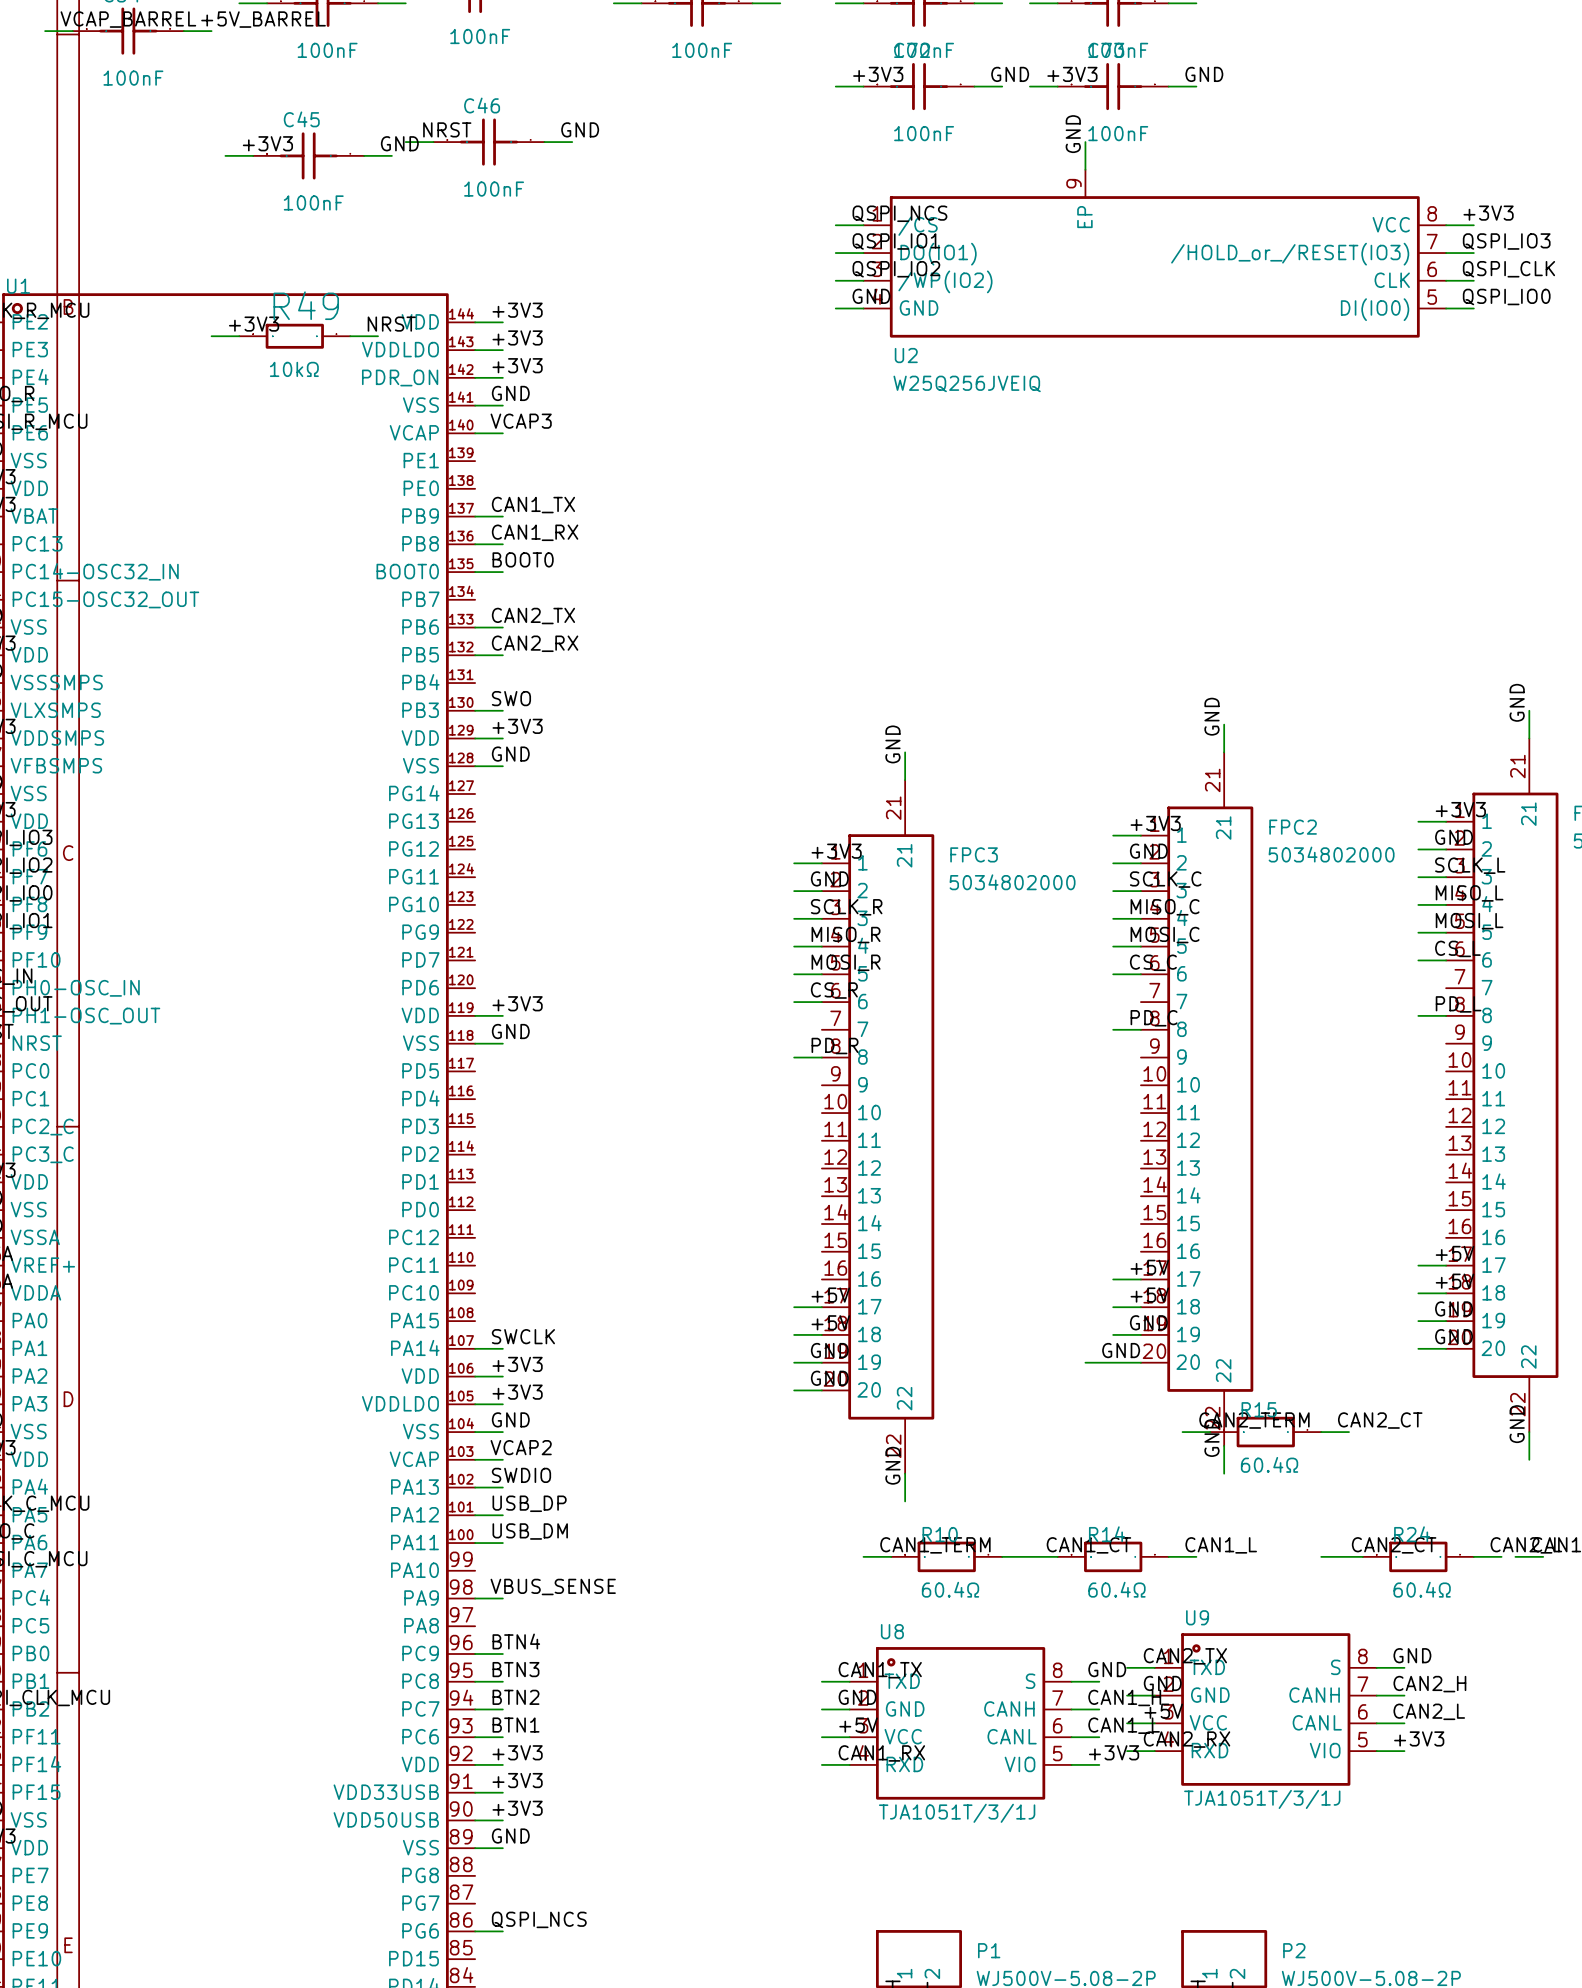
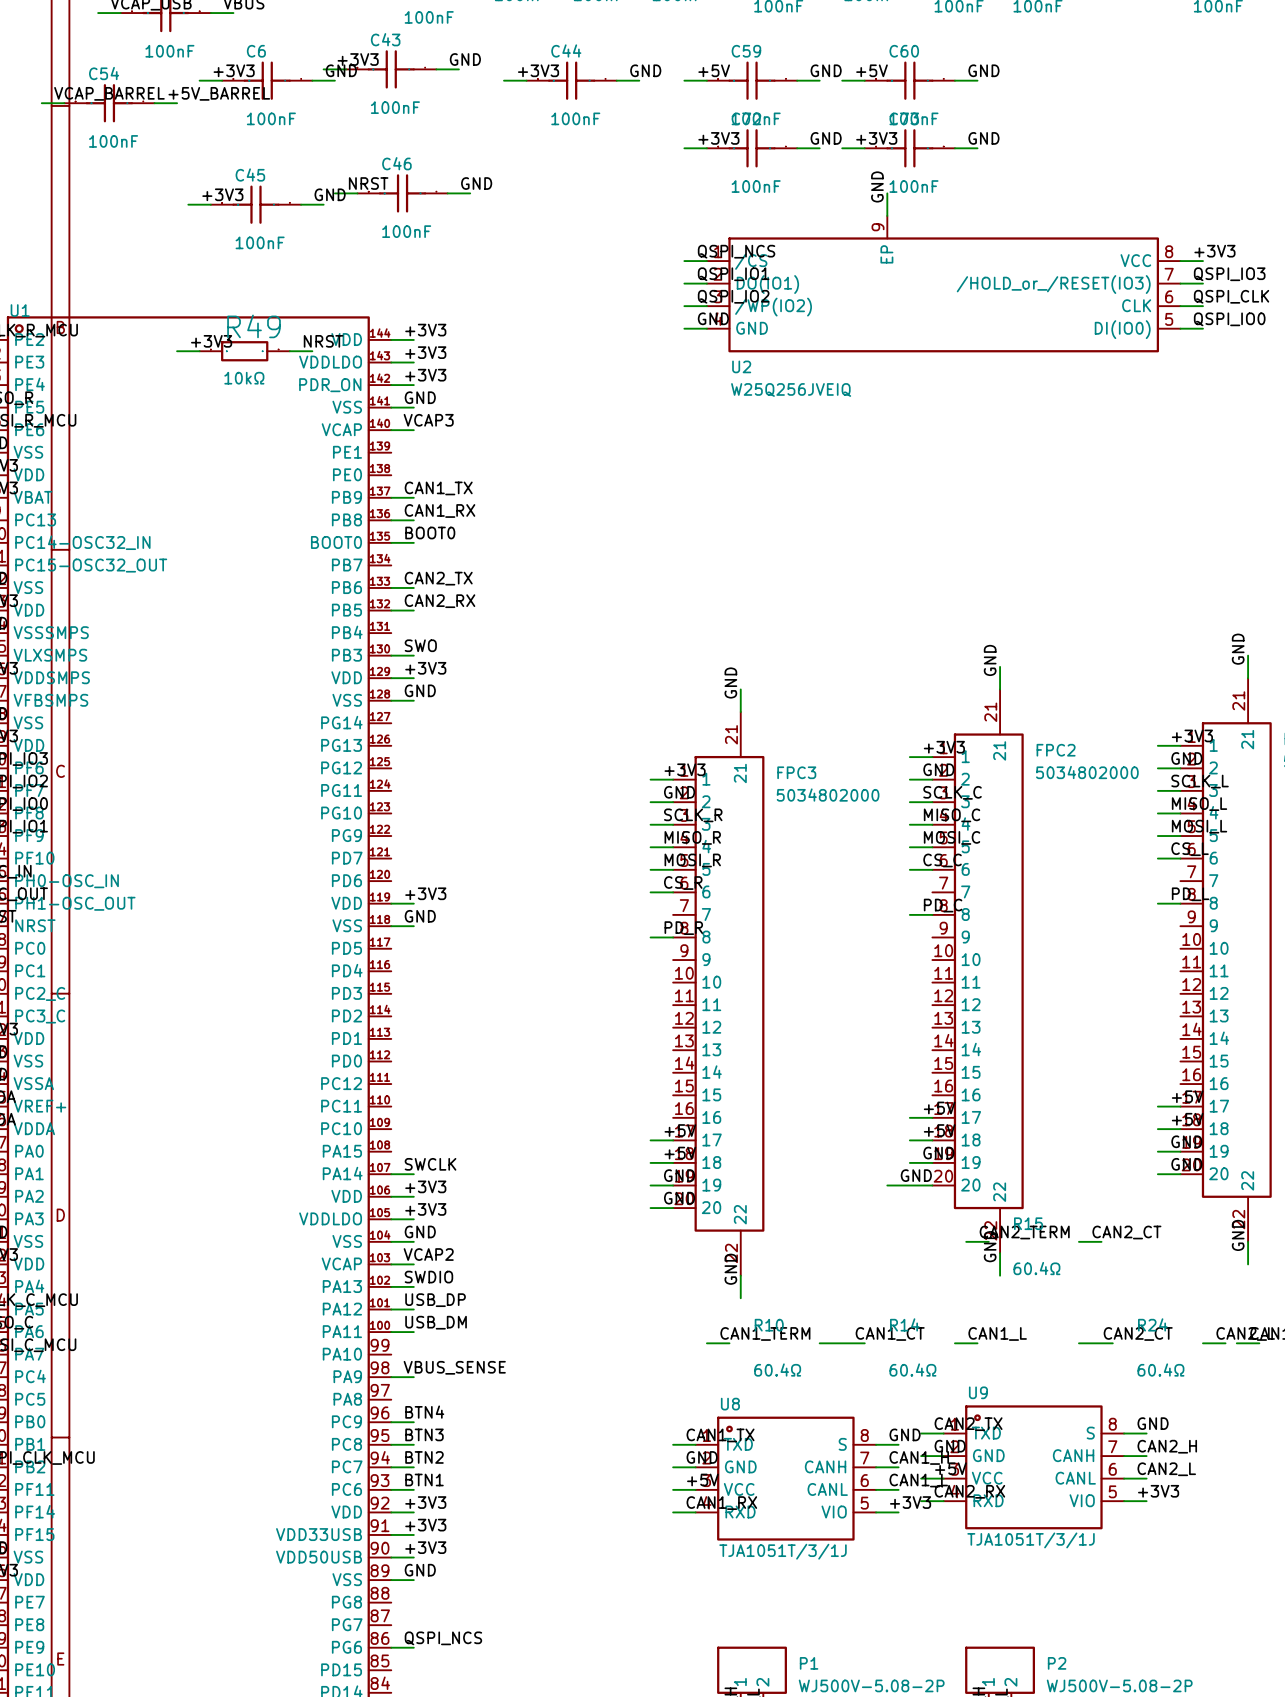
R15 symbol: [1210, 1416, 1322, 1448] -> [1013, 1217, 1061, 1276]
R10 symbol: [891, 1541, 1003, 1573] -> [754, 1318, 801, 1377]
R14 symbol: [1057, 1541, 1169, 1573] -> [889, 1318, 937, 1377]
R24 symbol: [1362, 1541, 1474, 1573] -> [1137, 1318, 1185, 1377]

